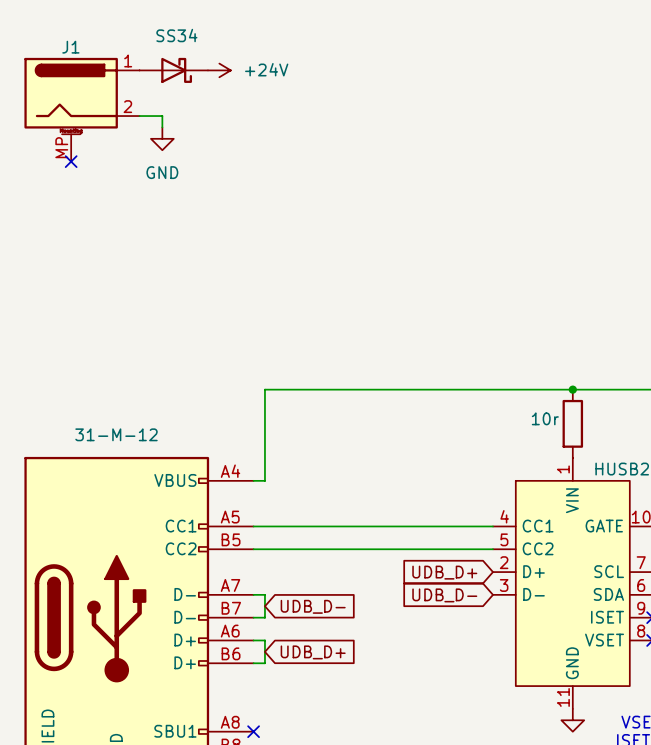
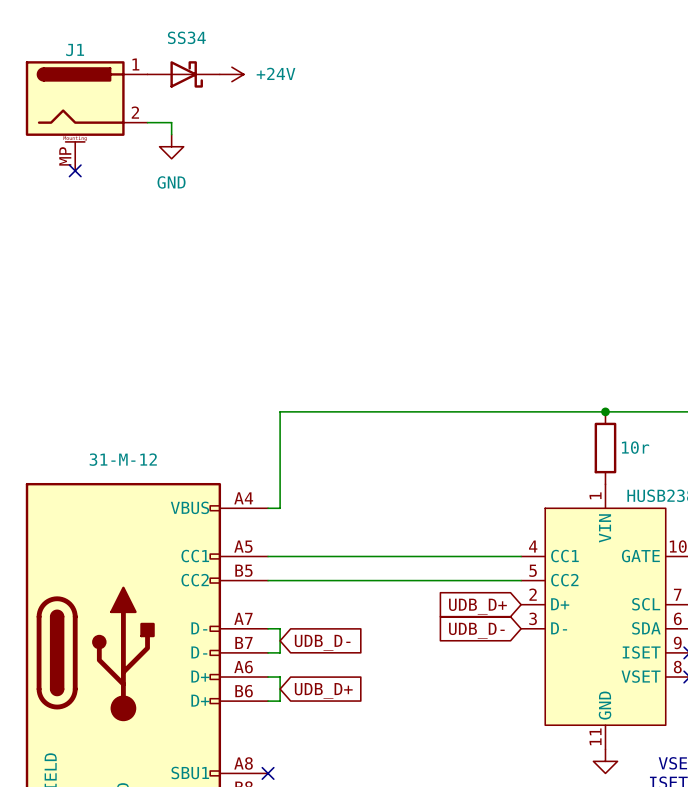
part value position: 10r (545, 418) -> 10r (635, 447)

